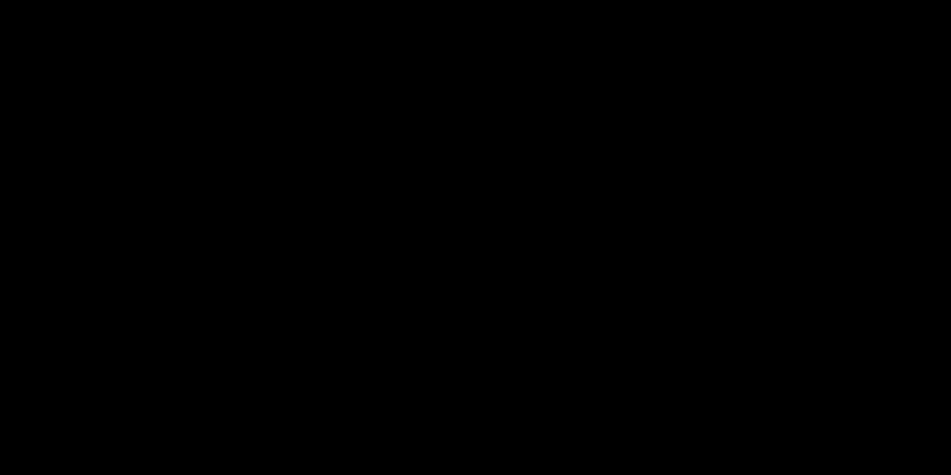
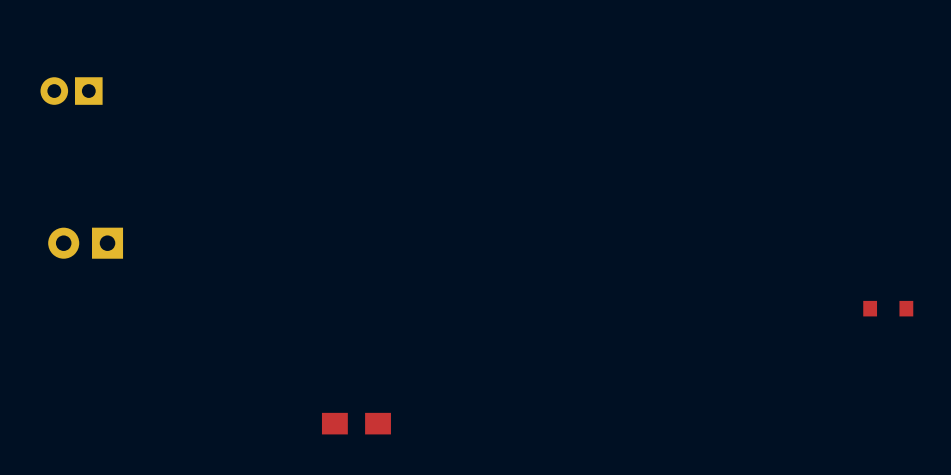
part: none -> (71, 91)
part: none -> (85, 243)
part: none -> (888, 308)
part: none -> (356, 423)

